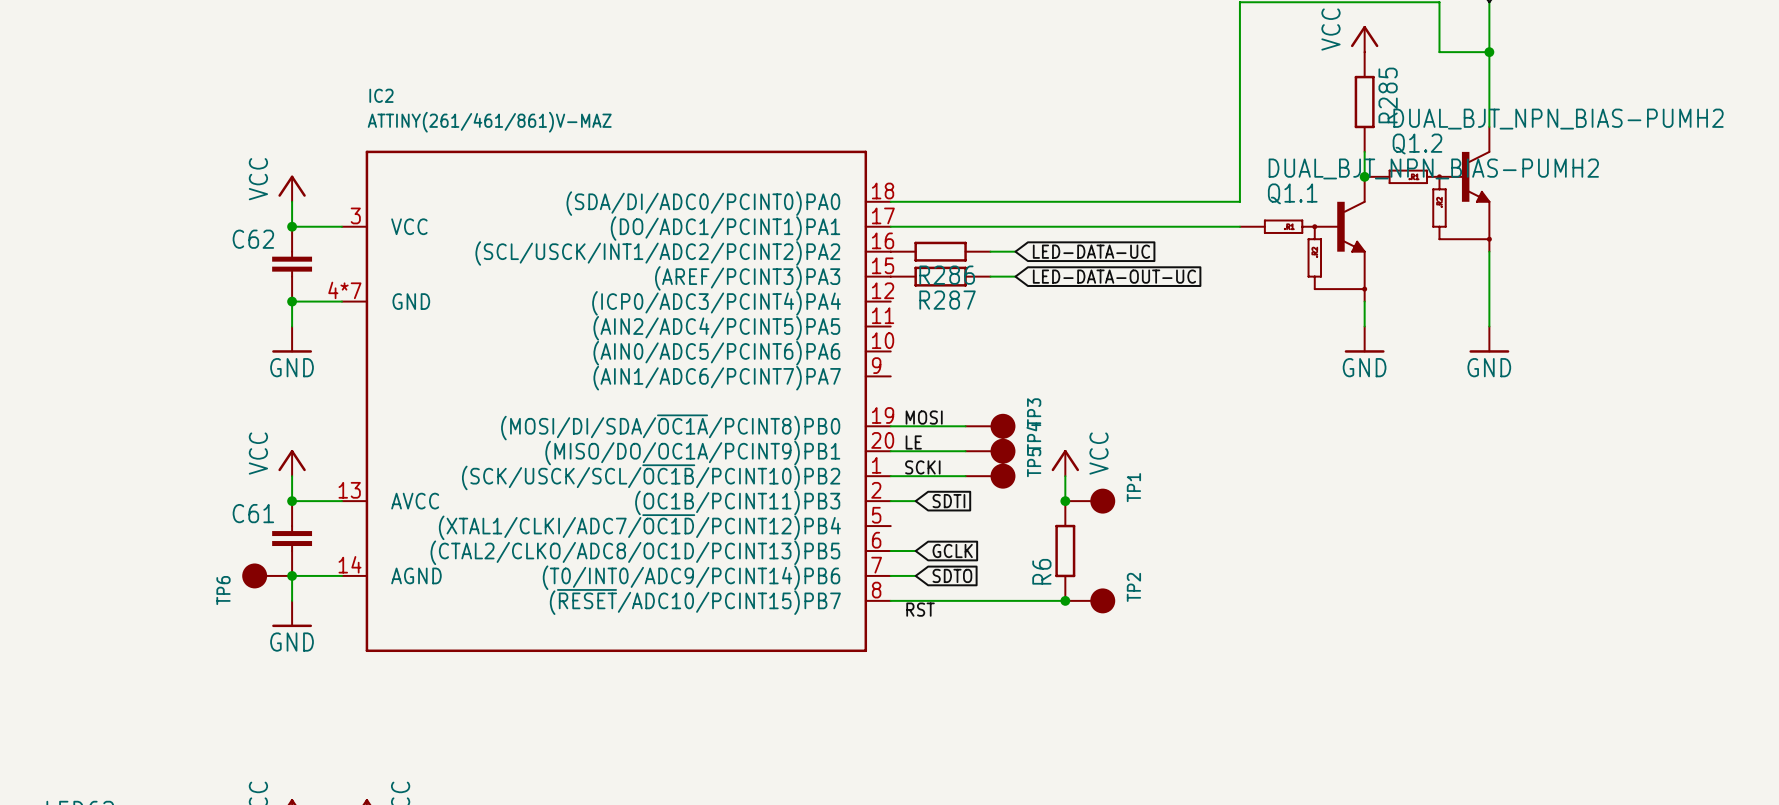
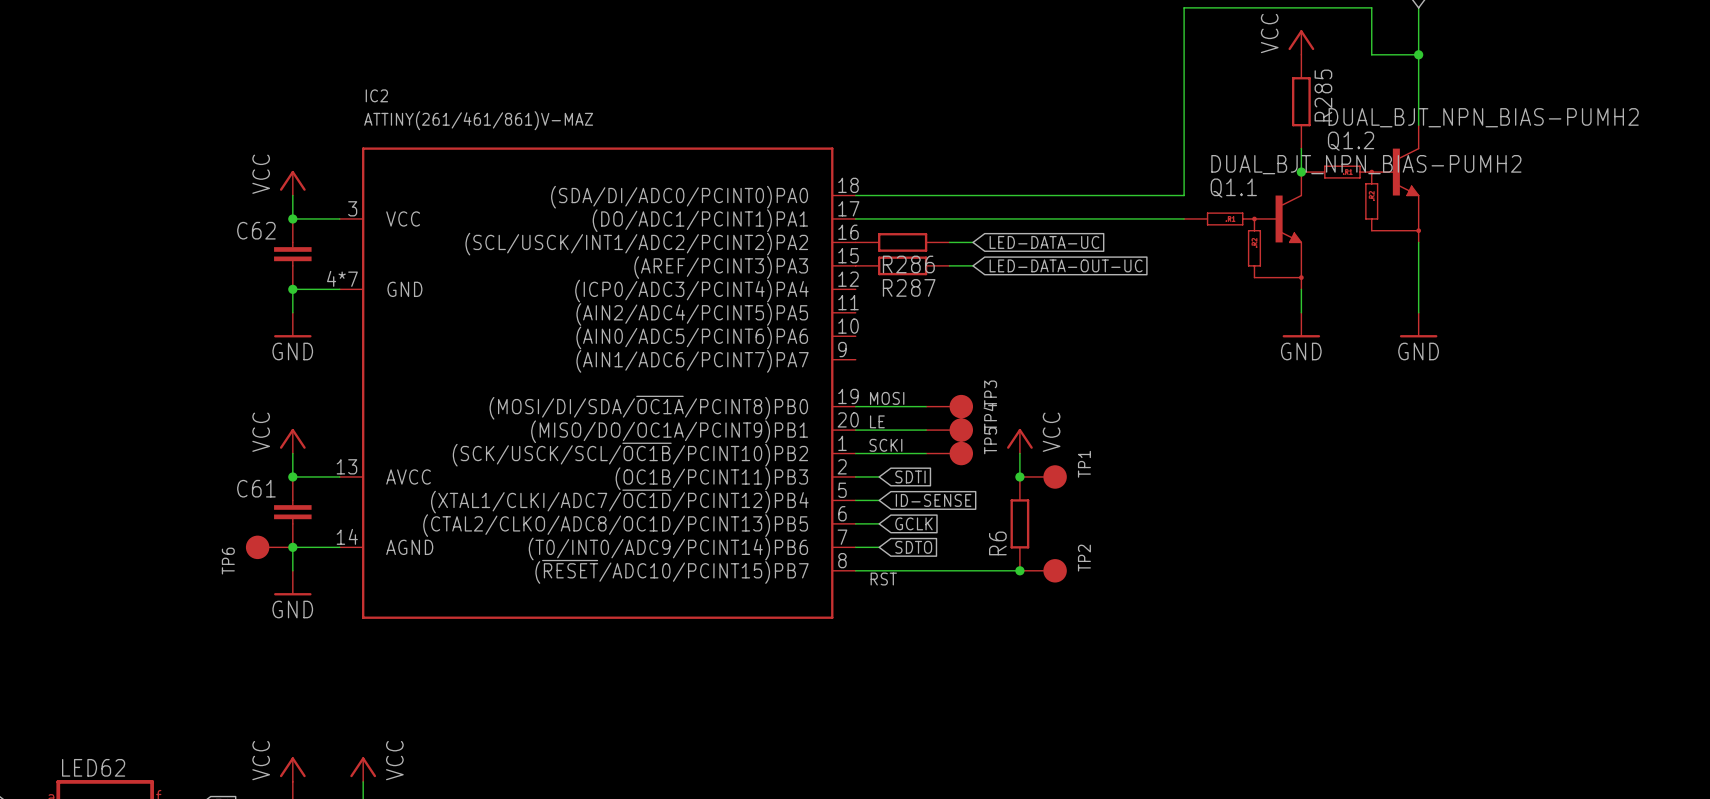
wire: none -> (855, 500) (879, 500)
global label: none -> ID-SENSE (933, 500)

